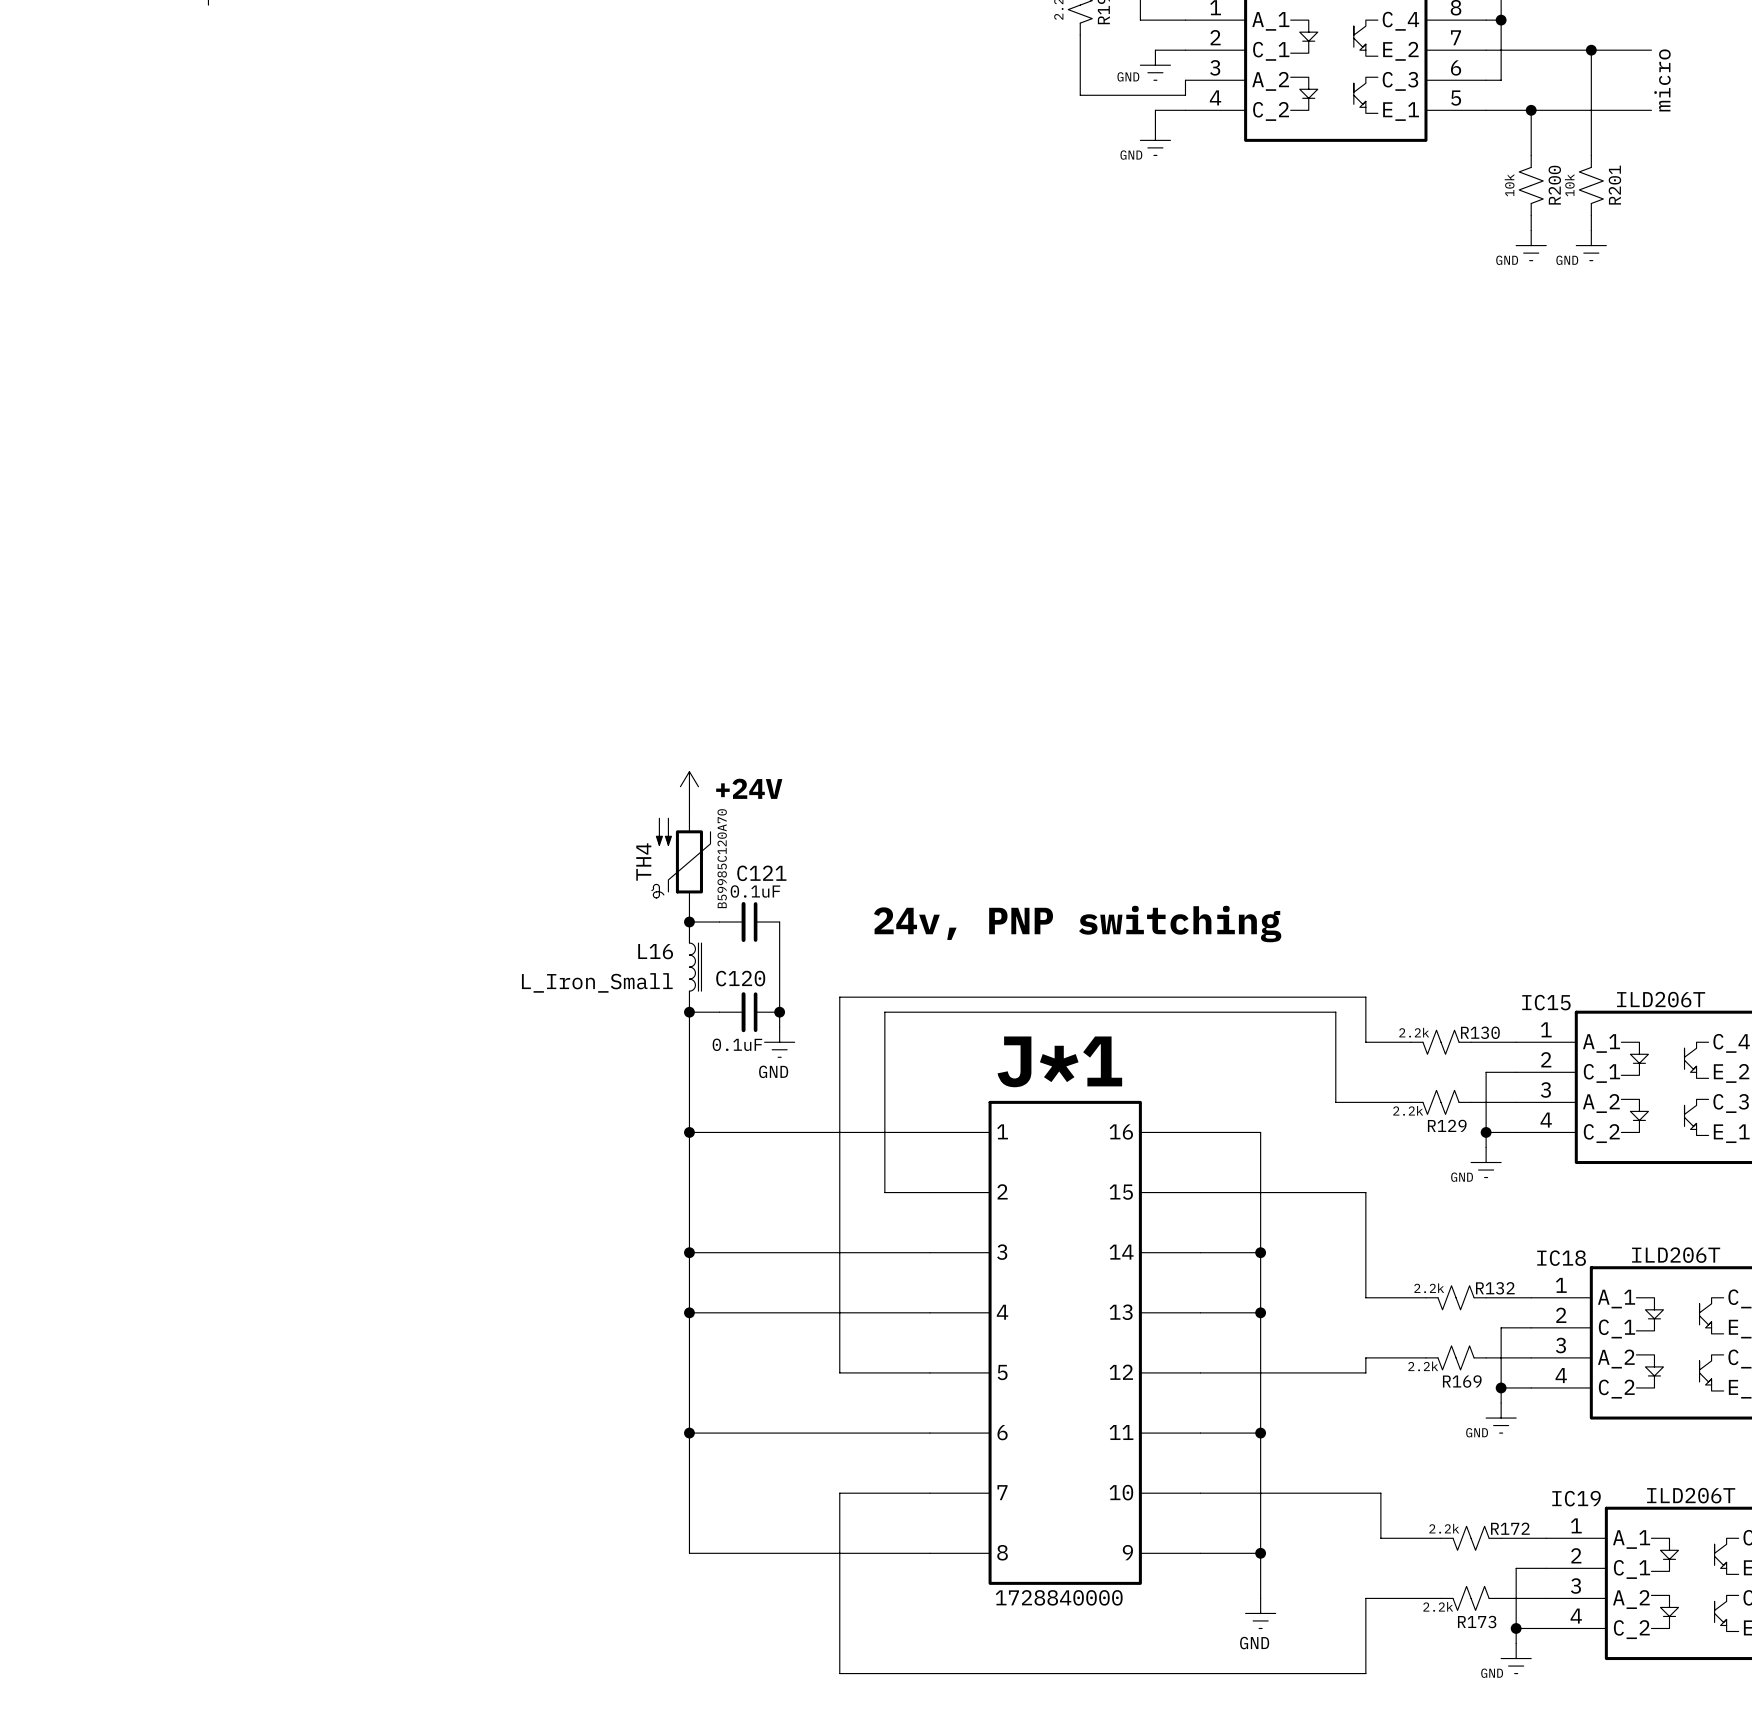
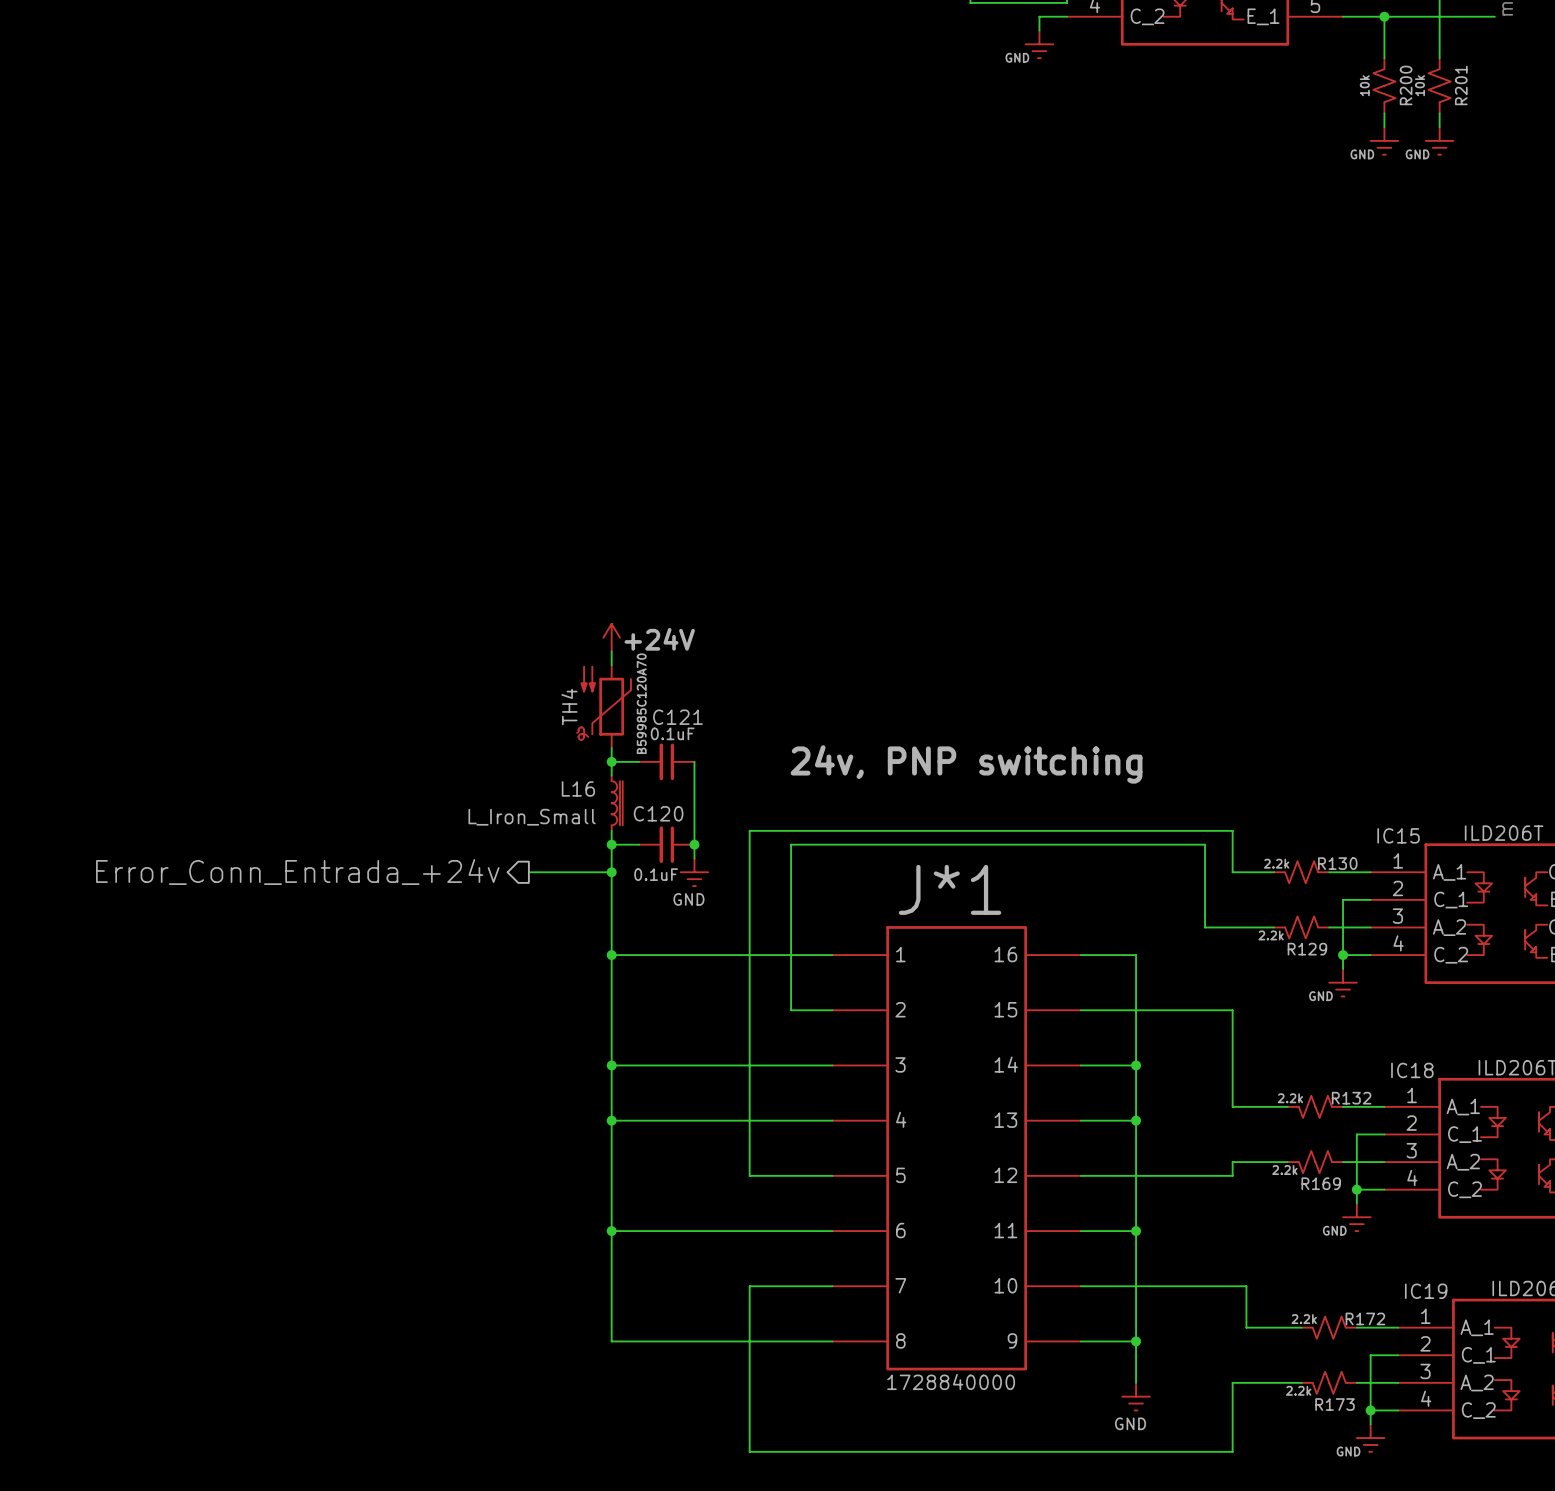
wire: none -> (528, 872) (611, 872)
junction: none -> (611, 872)
hierarchical label: none -> Error_Conn_Entrada_+24v (297, 871)

